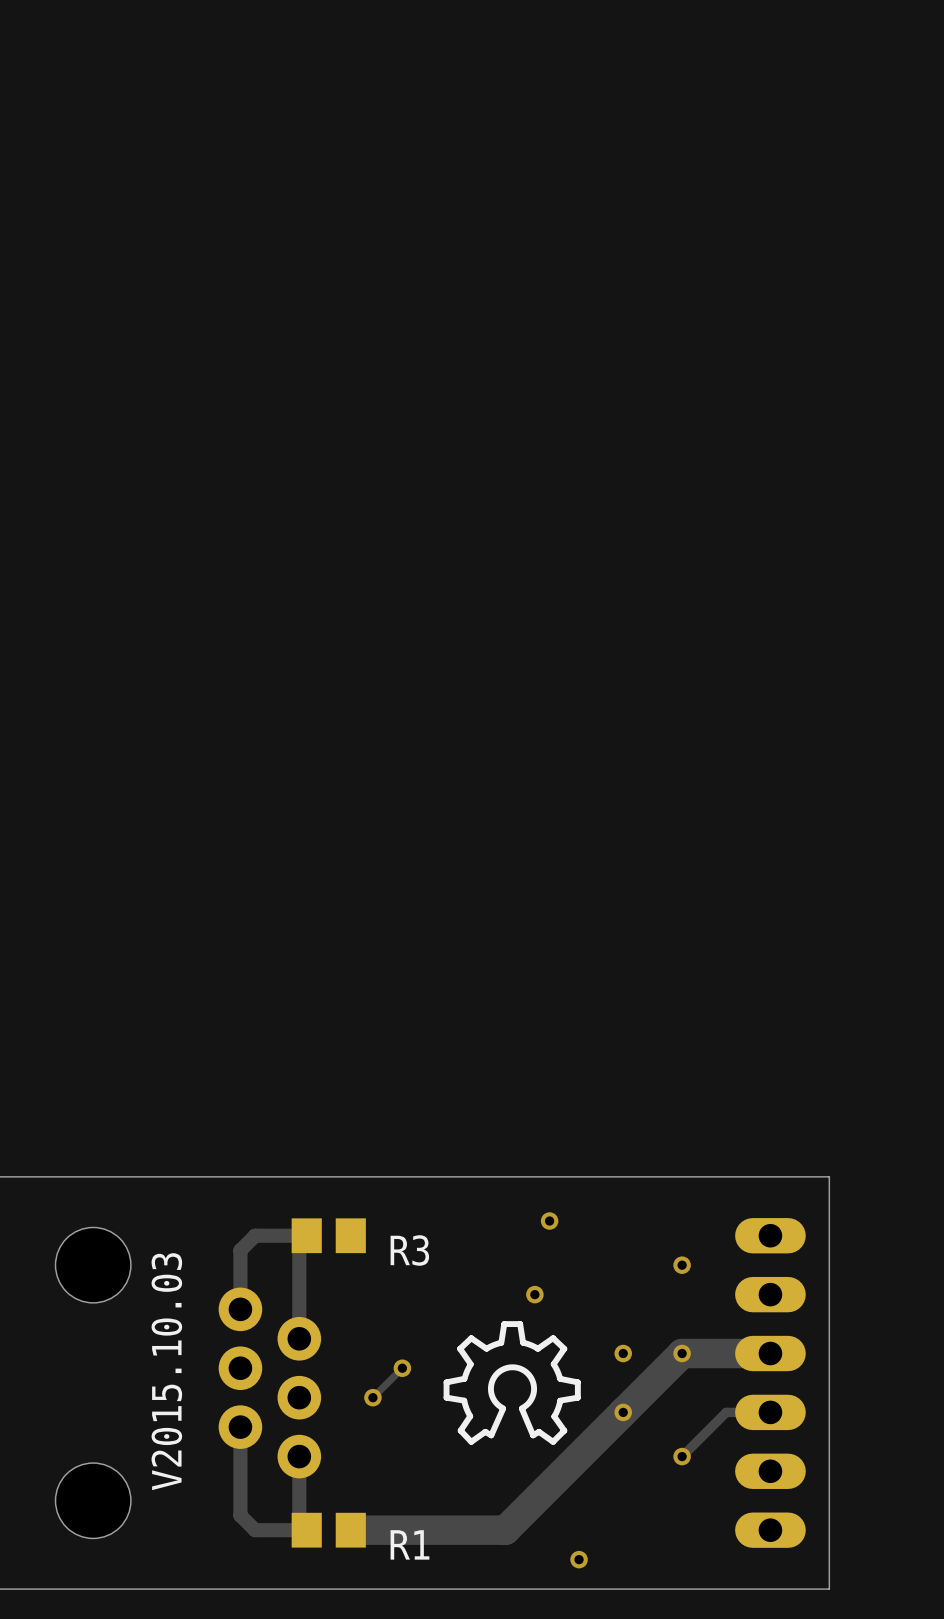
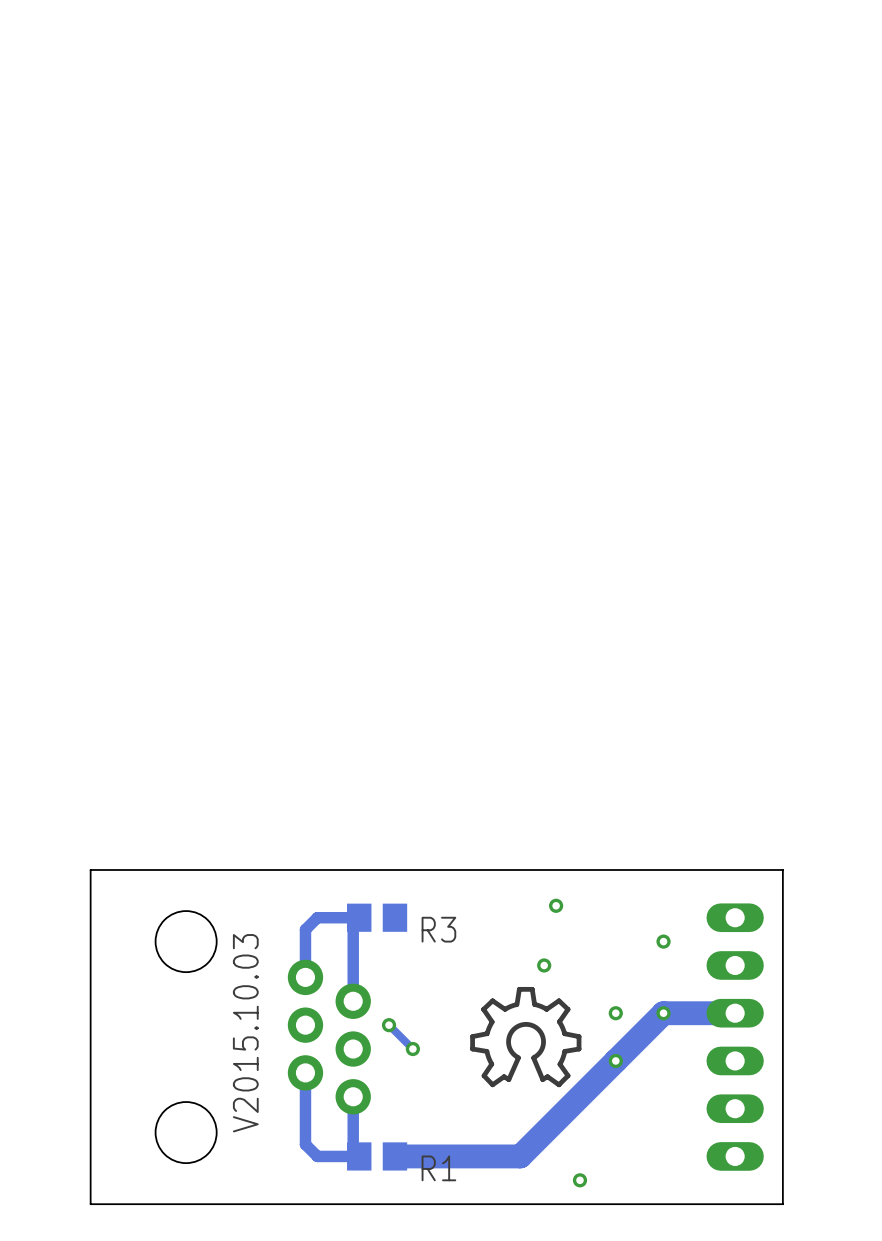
track: (402, 1368) (372, 1397) -> (389, 1025) (412, 1049)
via position: (402, 1368) -> (389, 1025)
track: (770, 1412) (726, 1412) (682, 1456) -> none
via: (682, 1456) -> none

